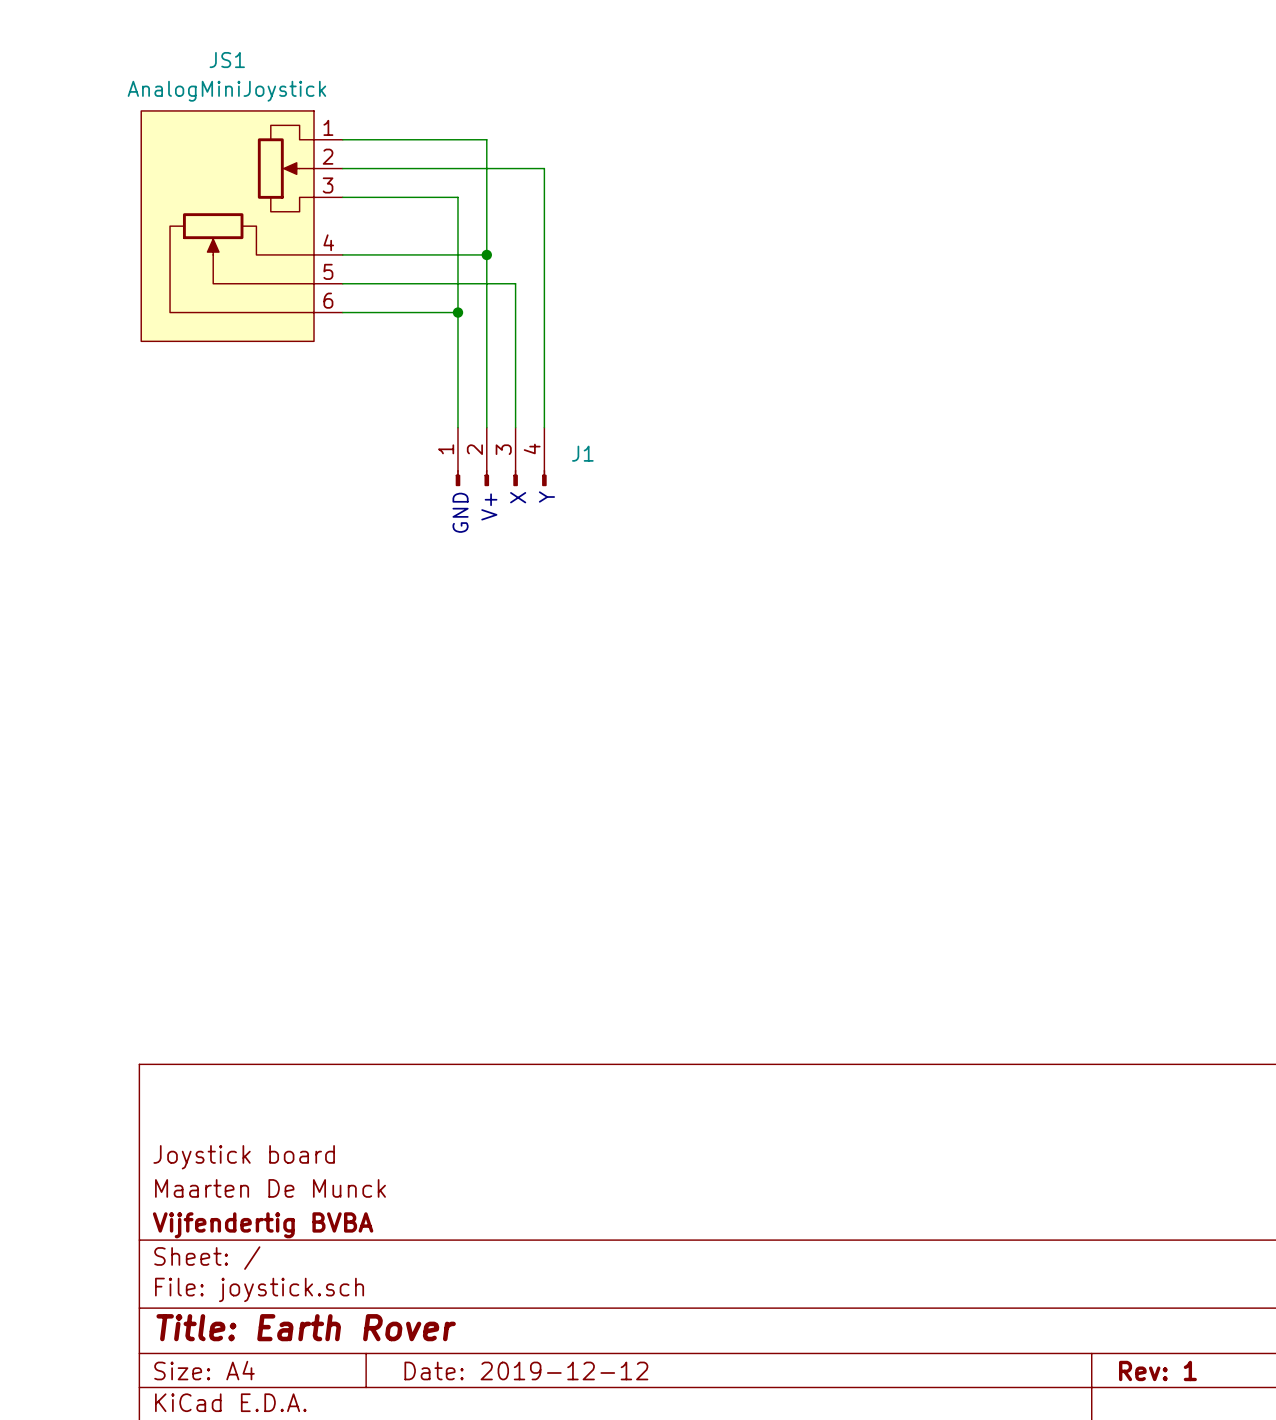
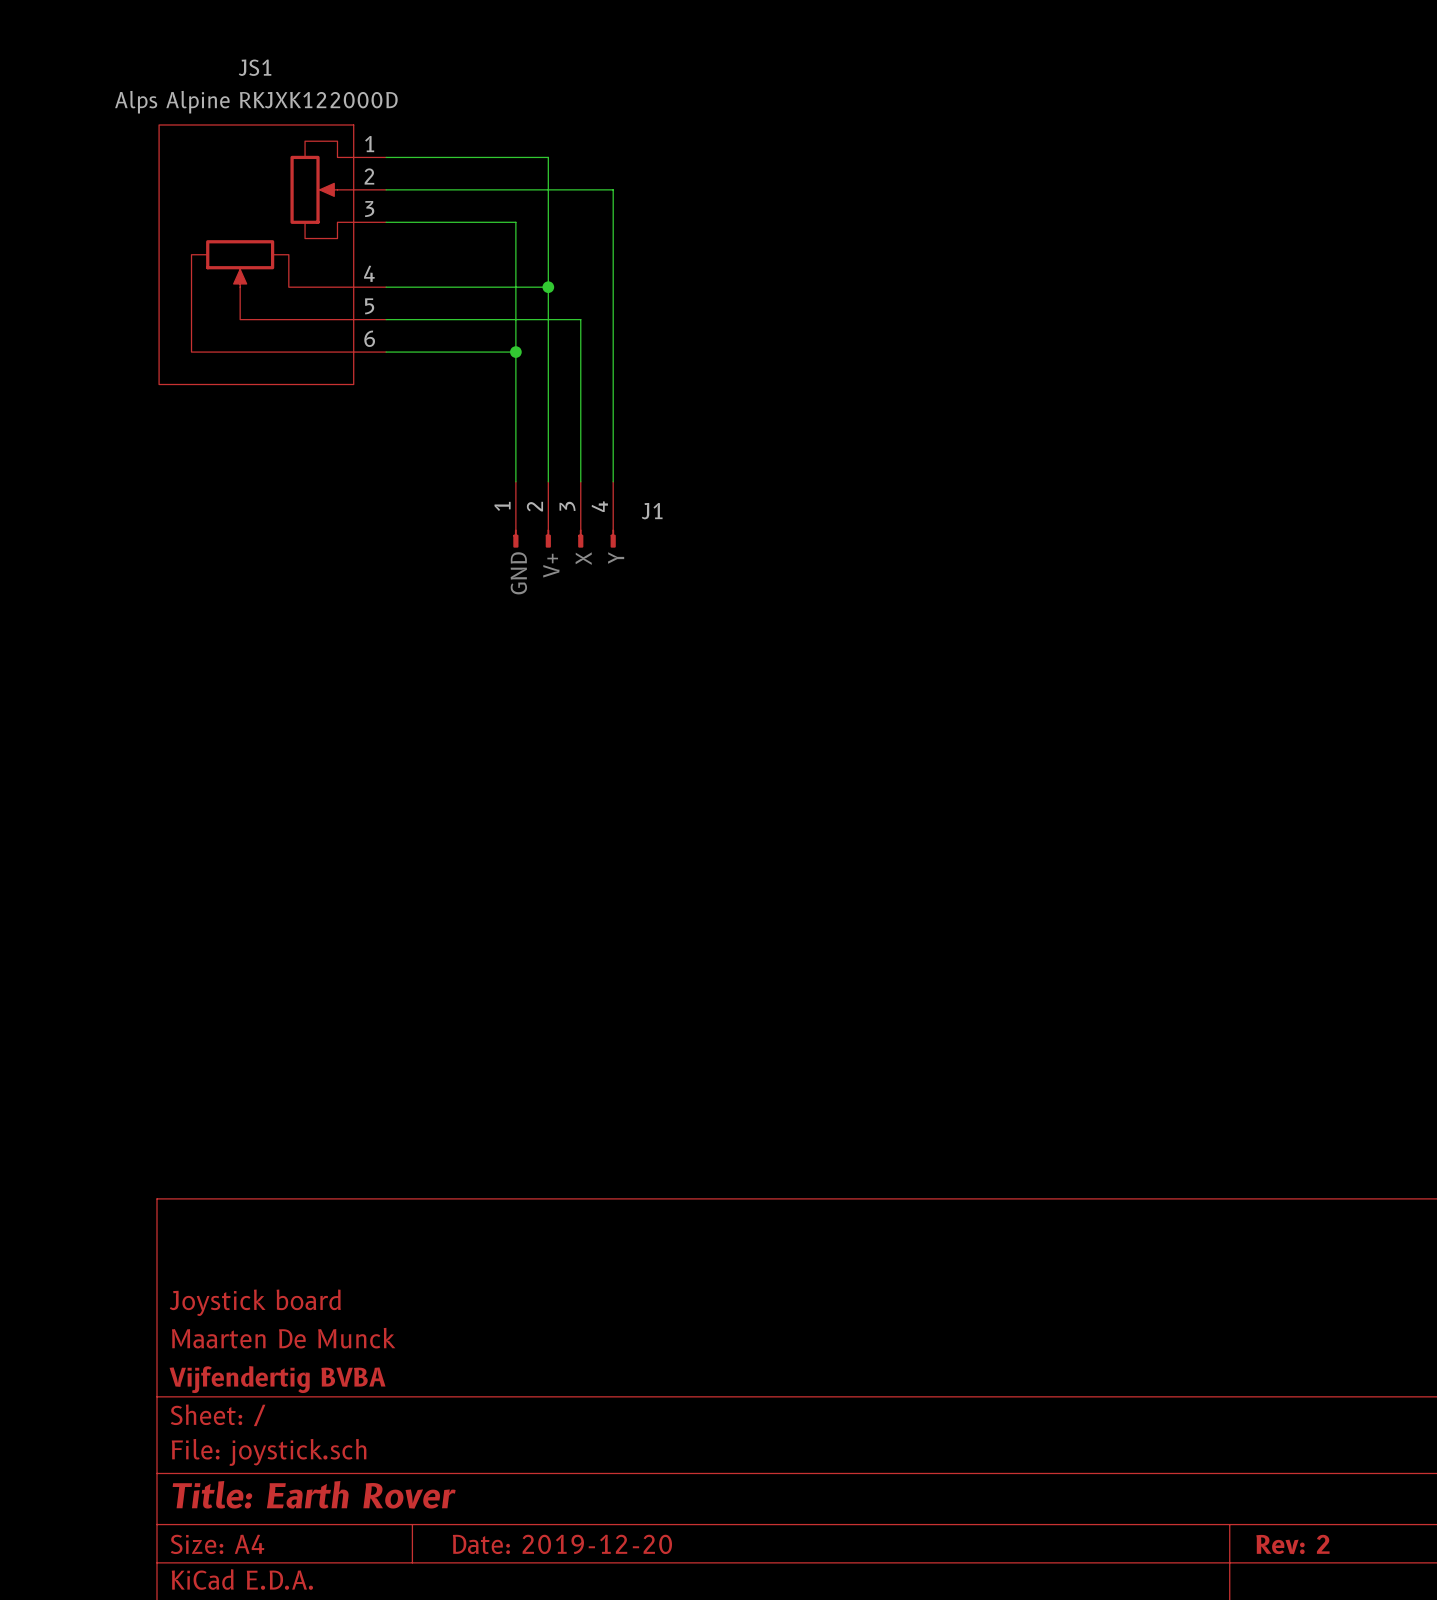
JS1 value: AnalogMiniJoystick (226, 91) -> Alps Alpine RKJXK122000D (256, 102)
title block: Date: 2019-12-12 (526, 1370) -> Date: 2019-12-20 (562, 1544)
title block: Rev: 1 (1157, 1370) -> Rev: 2 (1292, 1544)

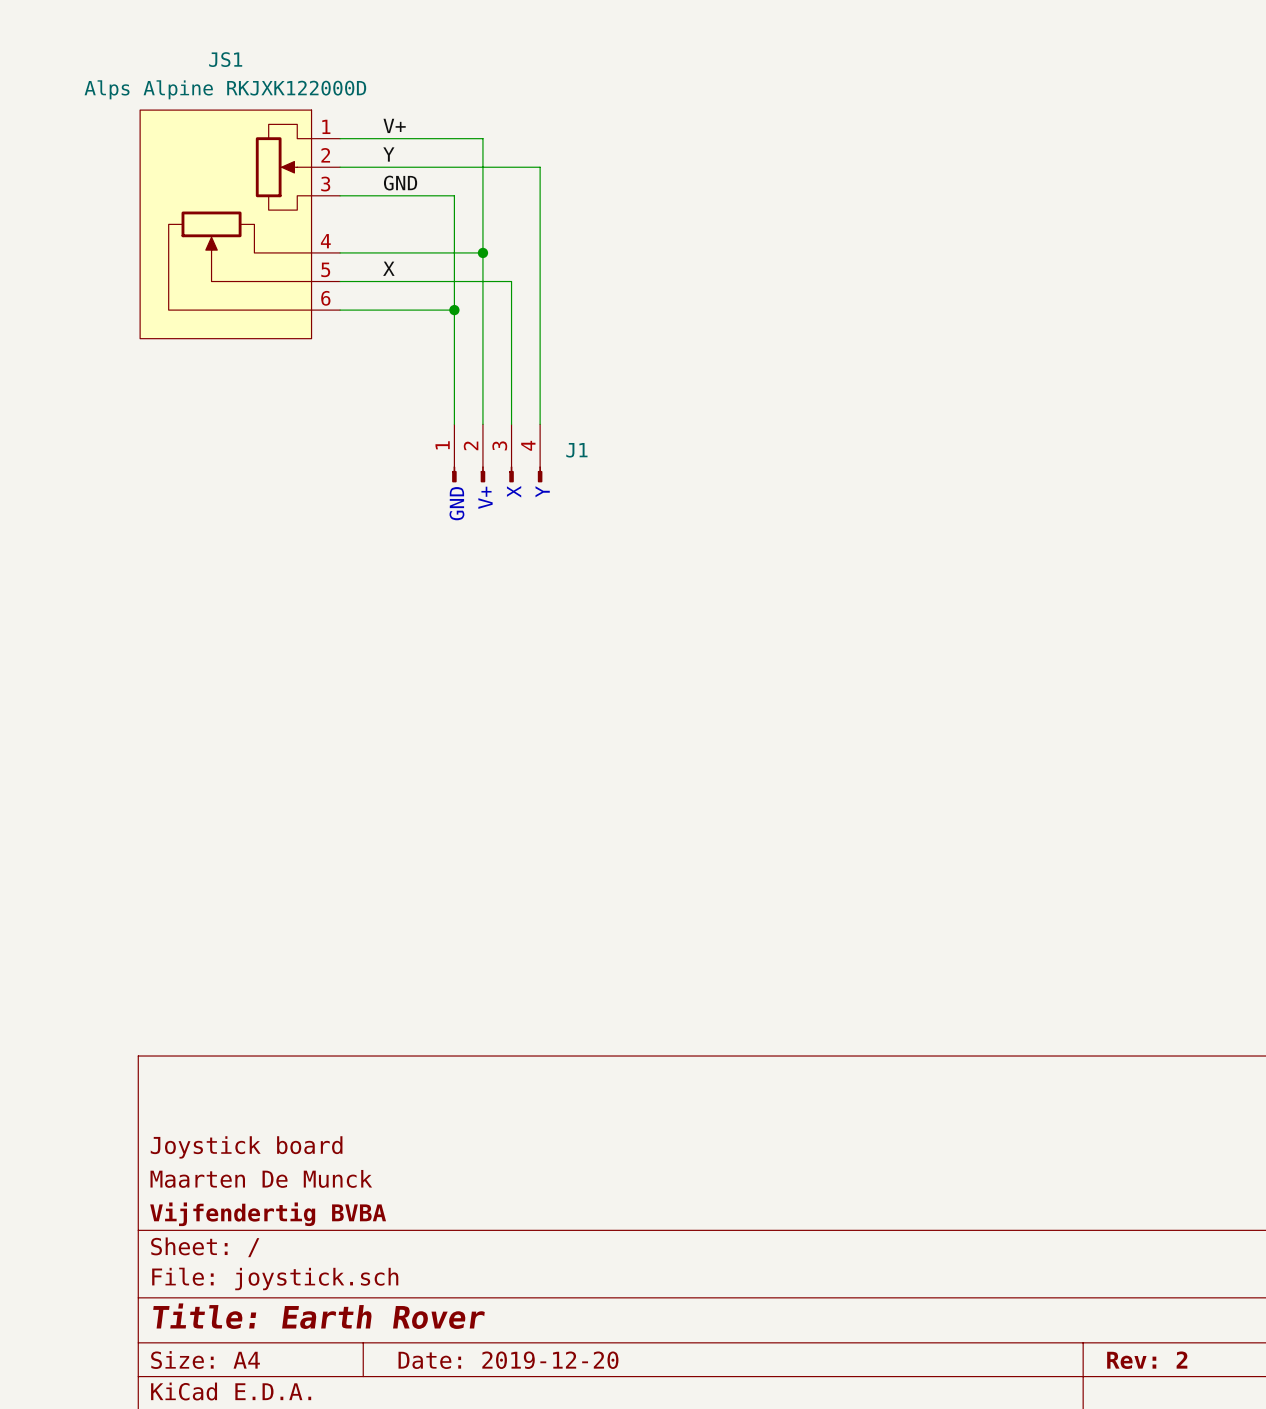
label: none -> V+ (394, 125)
label: none -> Y (388, 154)
label: none -> GND (400, 183)
label: none -> X (388, 268)

